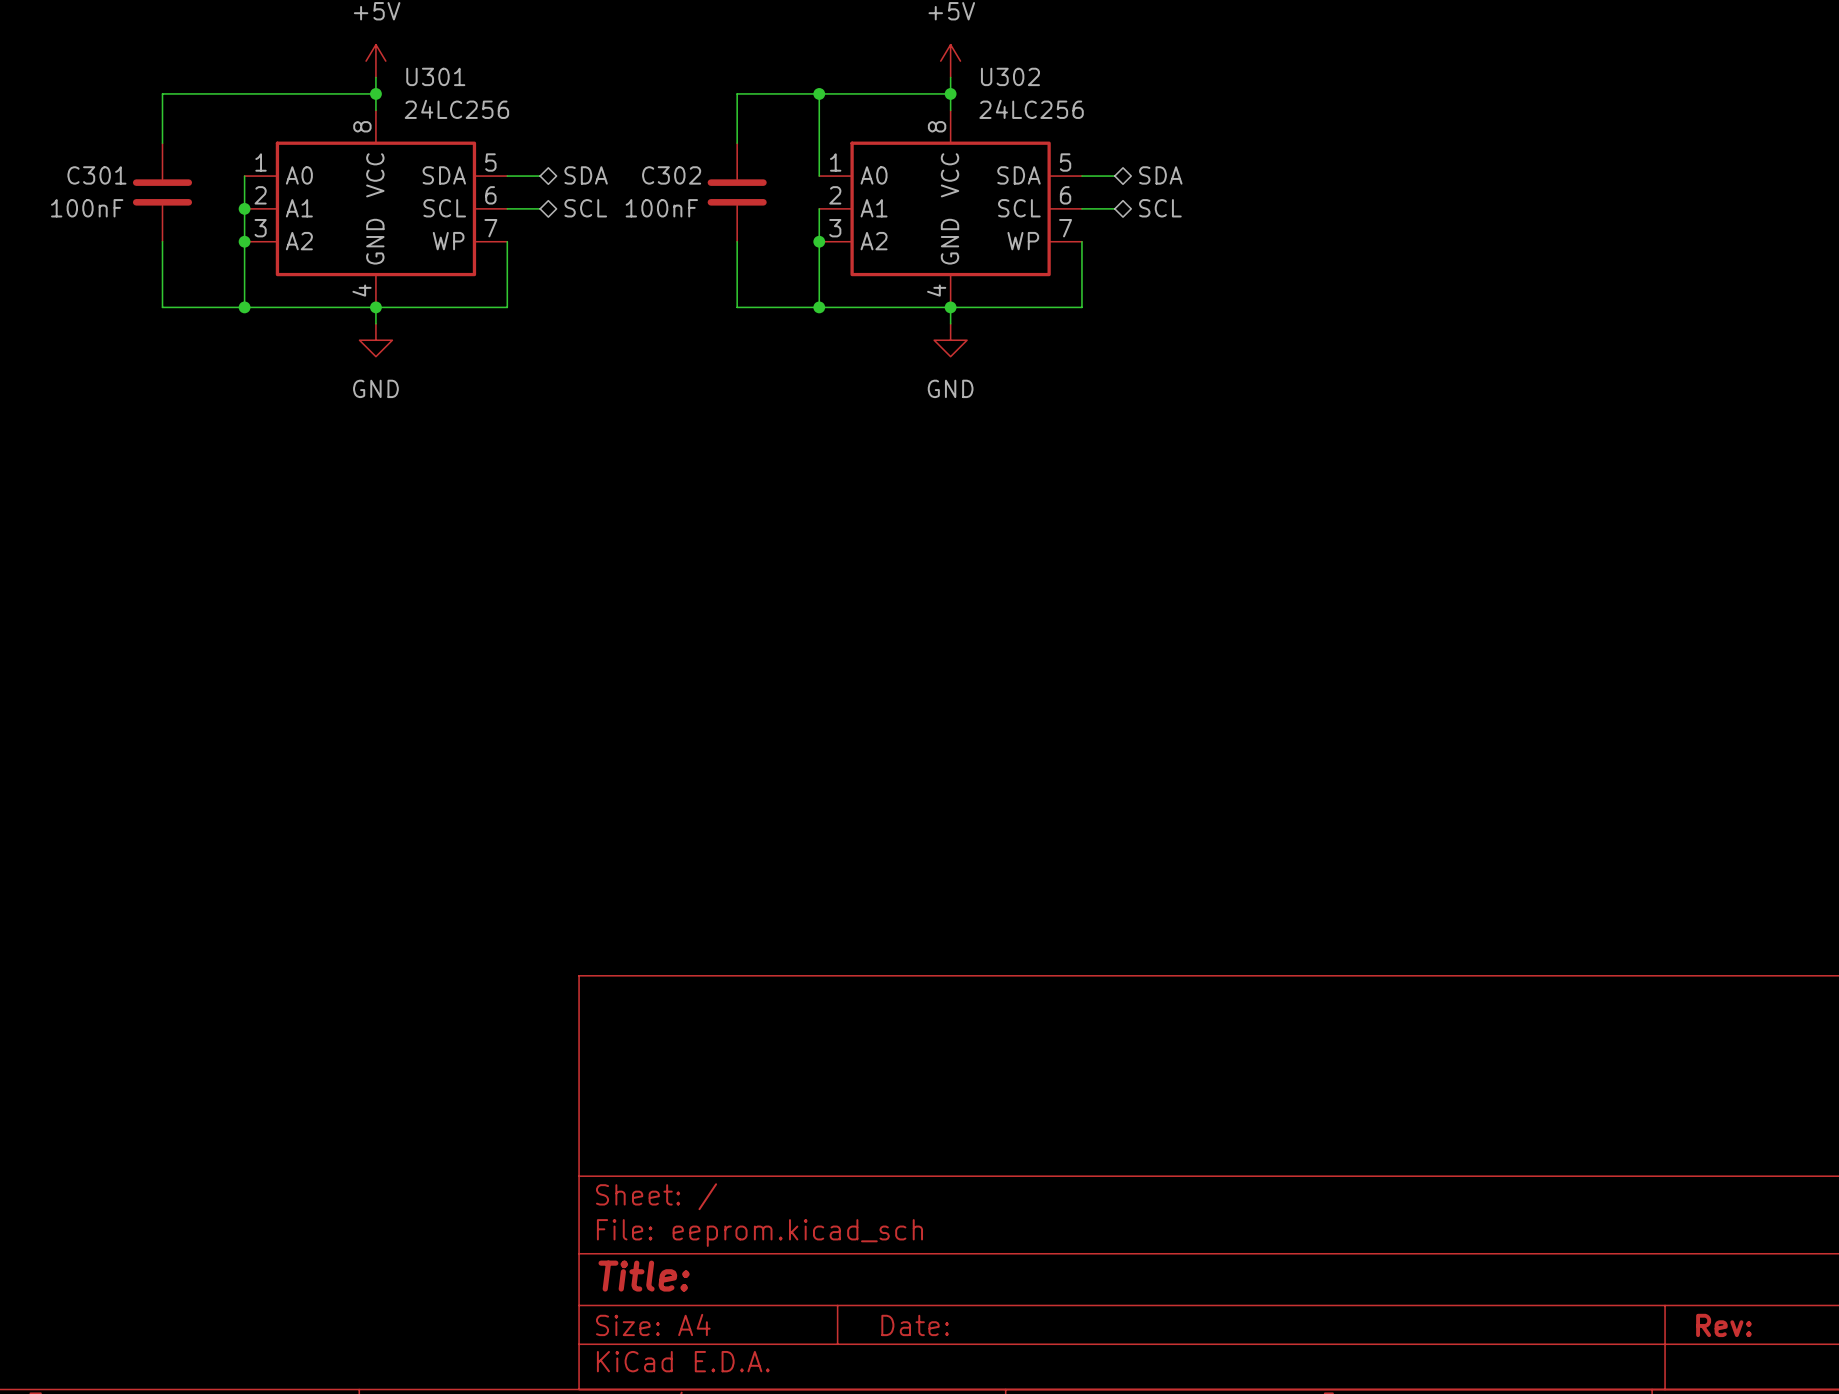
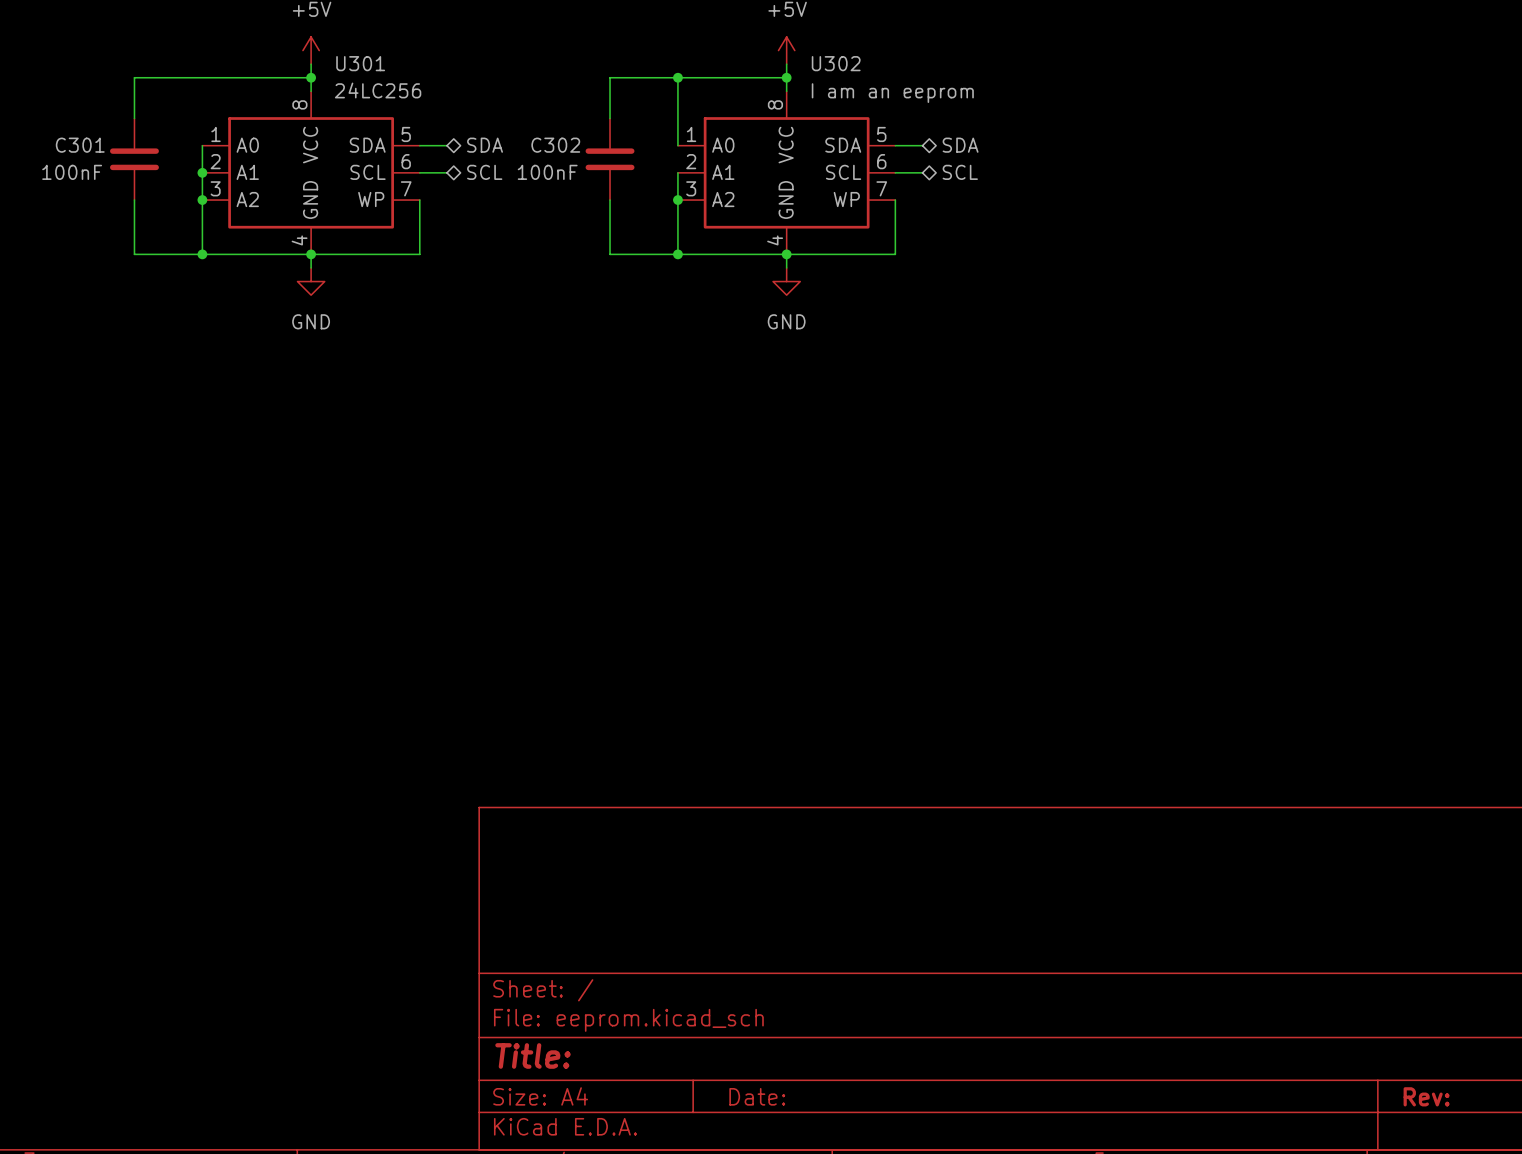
U302 value: 24LC256 (1031, 109) -> I am an eeprom (892, 93)

